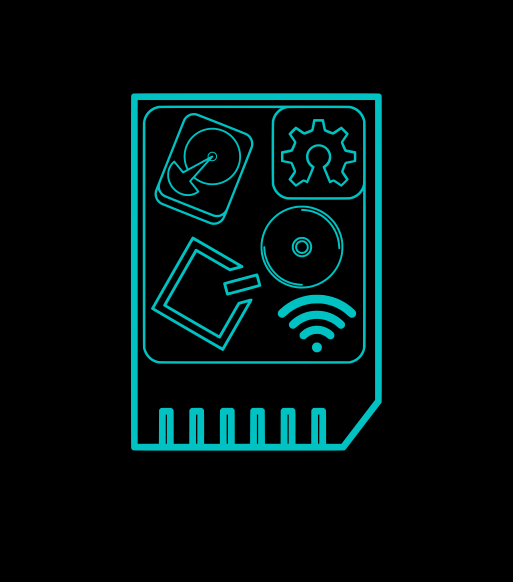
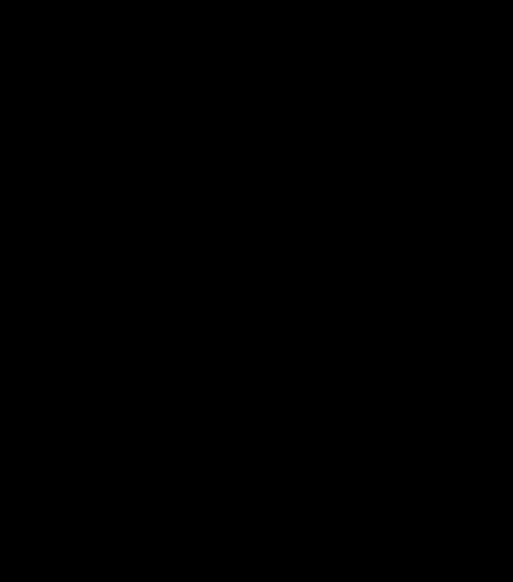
drawing: [130, 93, 382, 451] -> none

